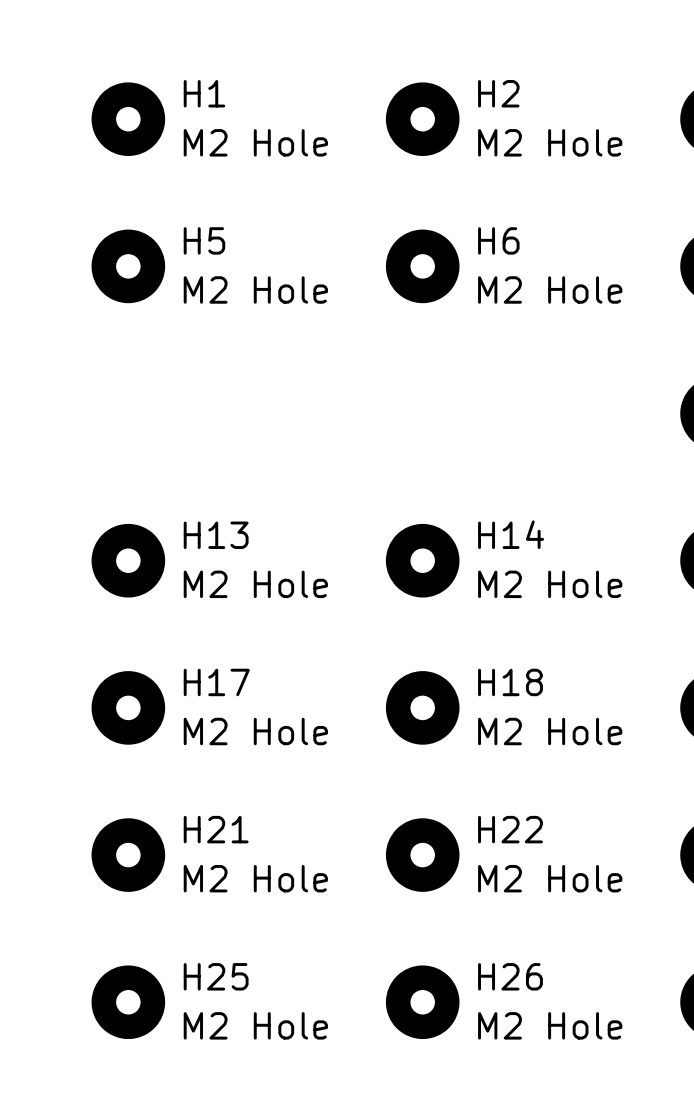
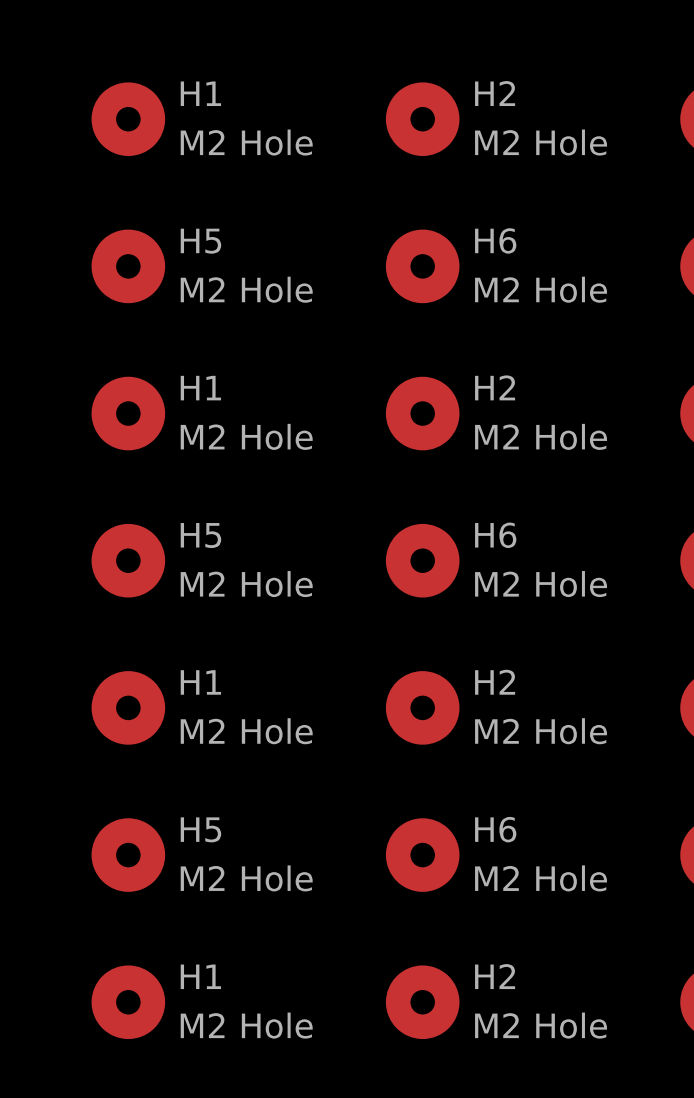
H1: none -> M2 Hole (128, 413)
H2: none -> M2 Hole (422, 413)
H14 name: H14 (511, 534) -> H6 (495, 535)
H13 name: H13 (216, 535) -> H5 (200, 535)
H17 name: H17 (216, 682) -> H1 (200, 682)
H18 name: H18 (510, 682) -> H2 (495, 682)
H21 name: H21 (216, 829) -> H5 (200, 829)
H22 name: H22 (510, 829) -> H6 (495, 829)
H25 name: H25 (216, 976) -> H1 (200, 976)
H26 name: H26 (510, 976) -> H2 (495, 976)

